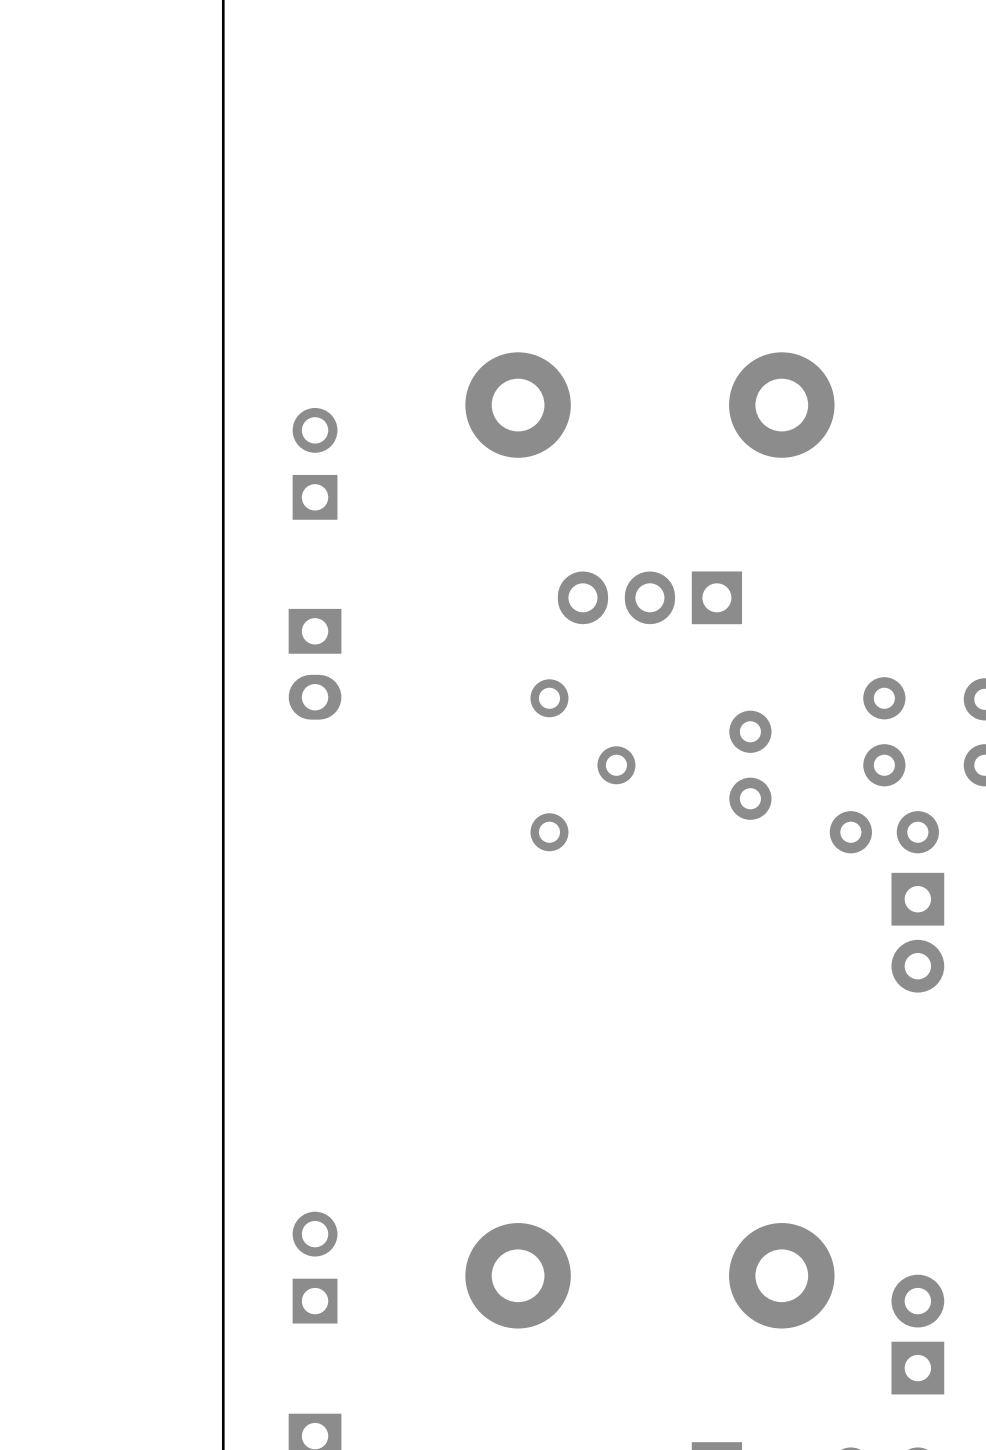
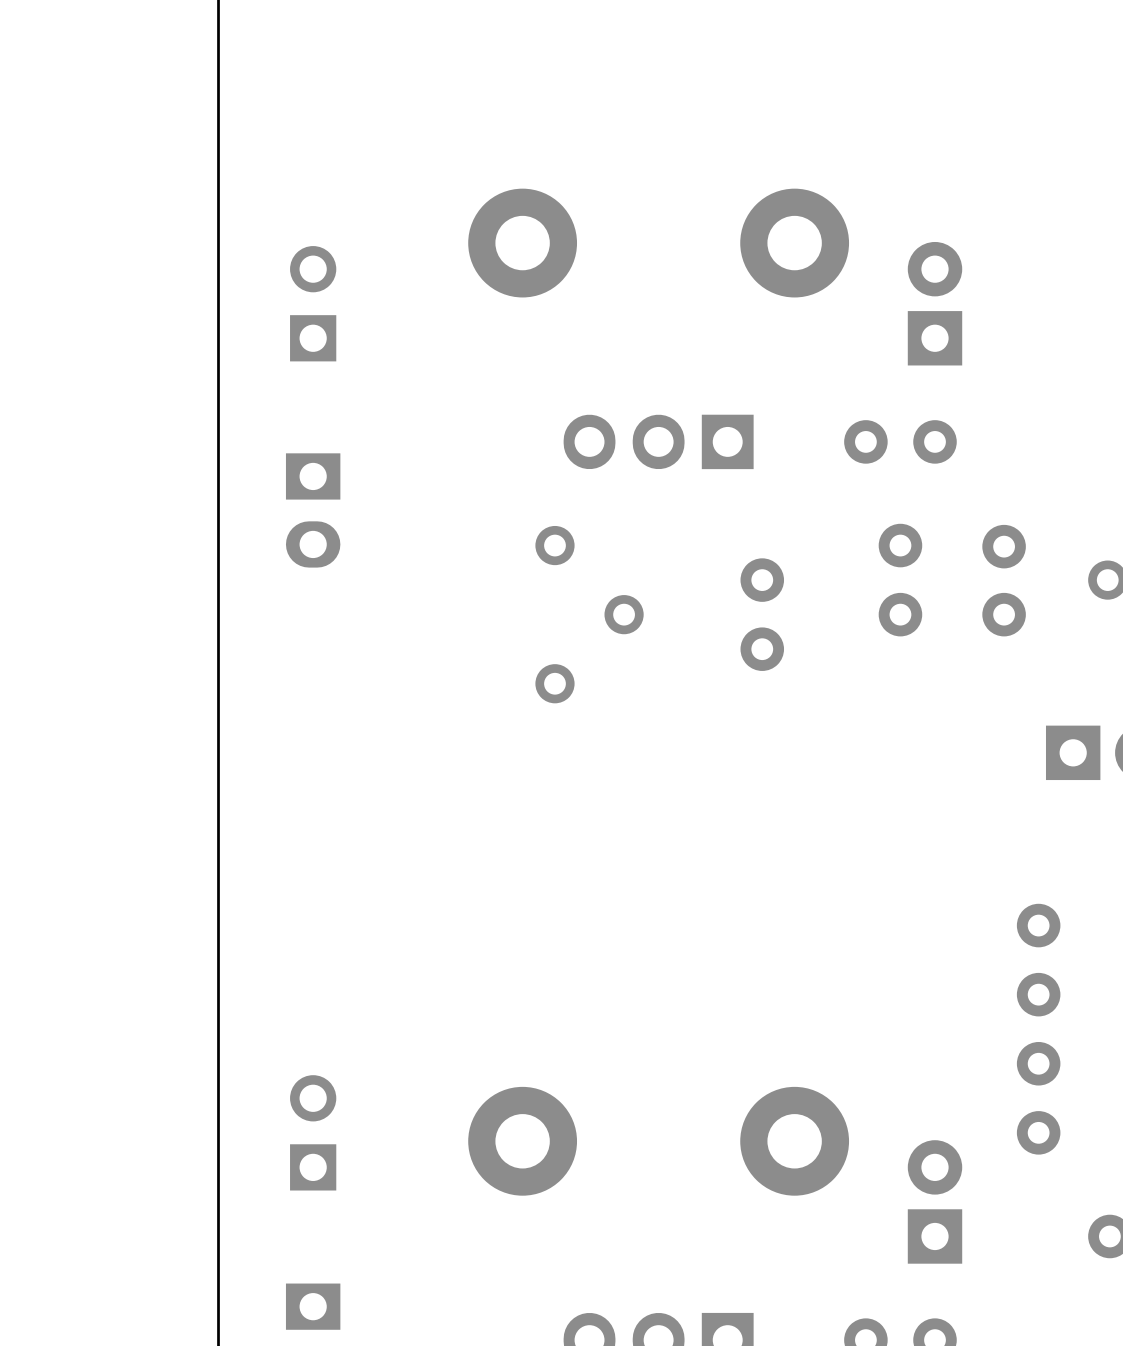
part position: (884, 832) -> (900, 441)
part rotation: 0° (917, 932) -> 180° (935, 303)
part position: (917, 932) -> (935, 303)

